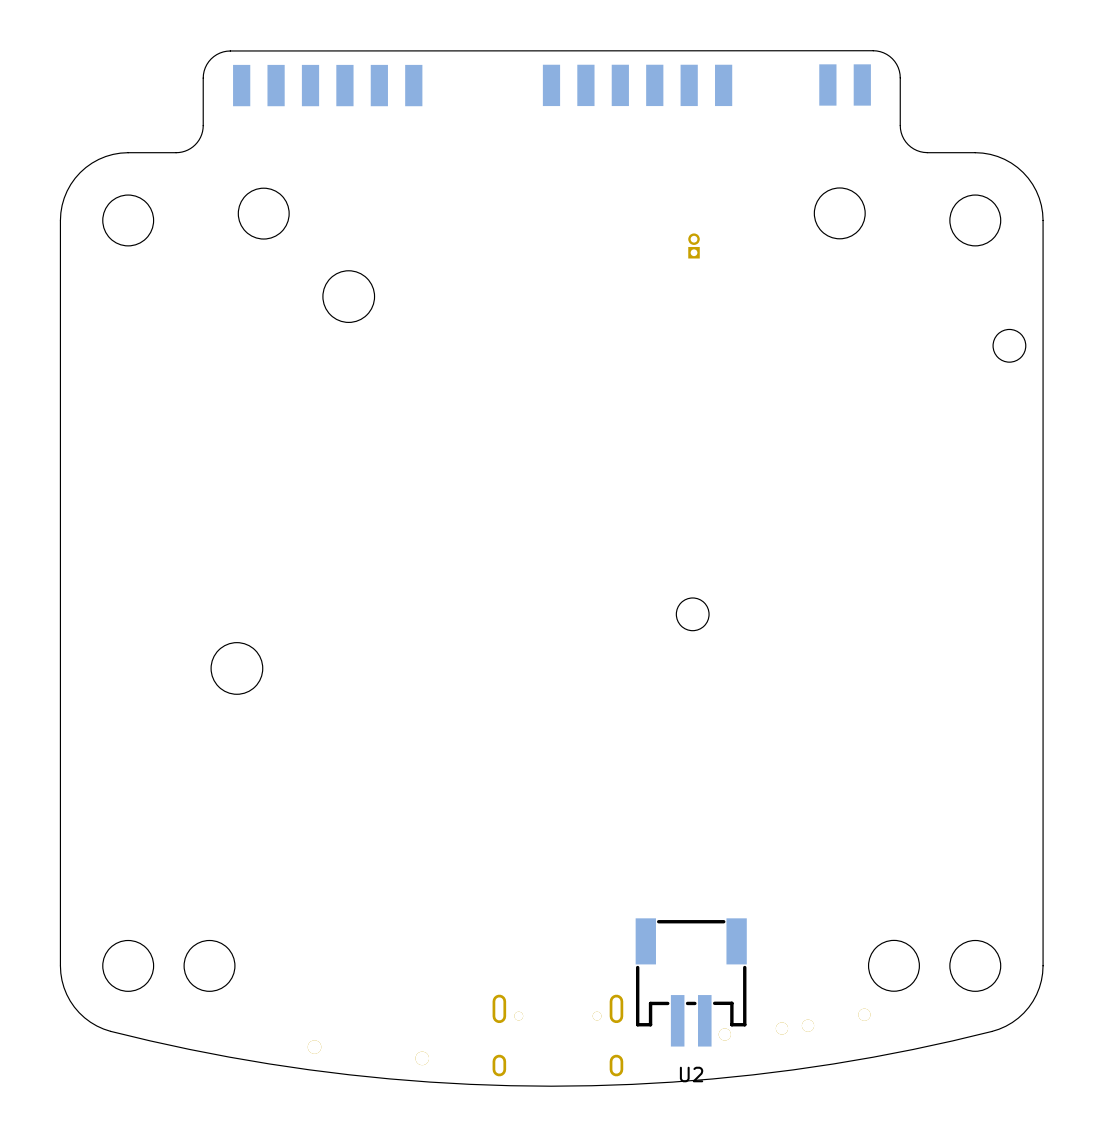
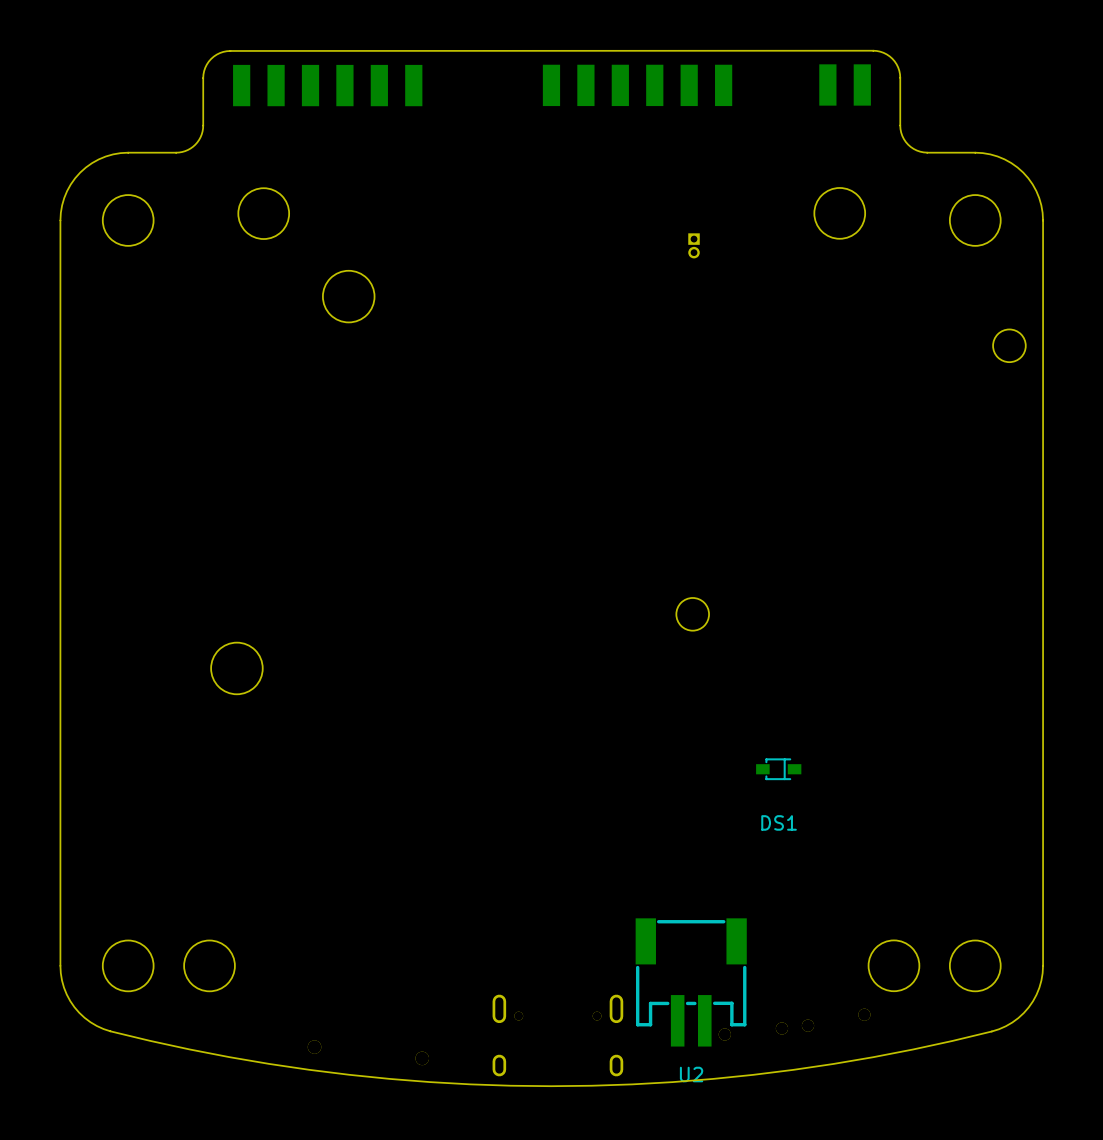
part rotation: 0° (694, 245) -> 180° (694, 245)
DS1: none -> (778, 769)

